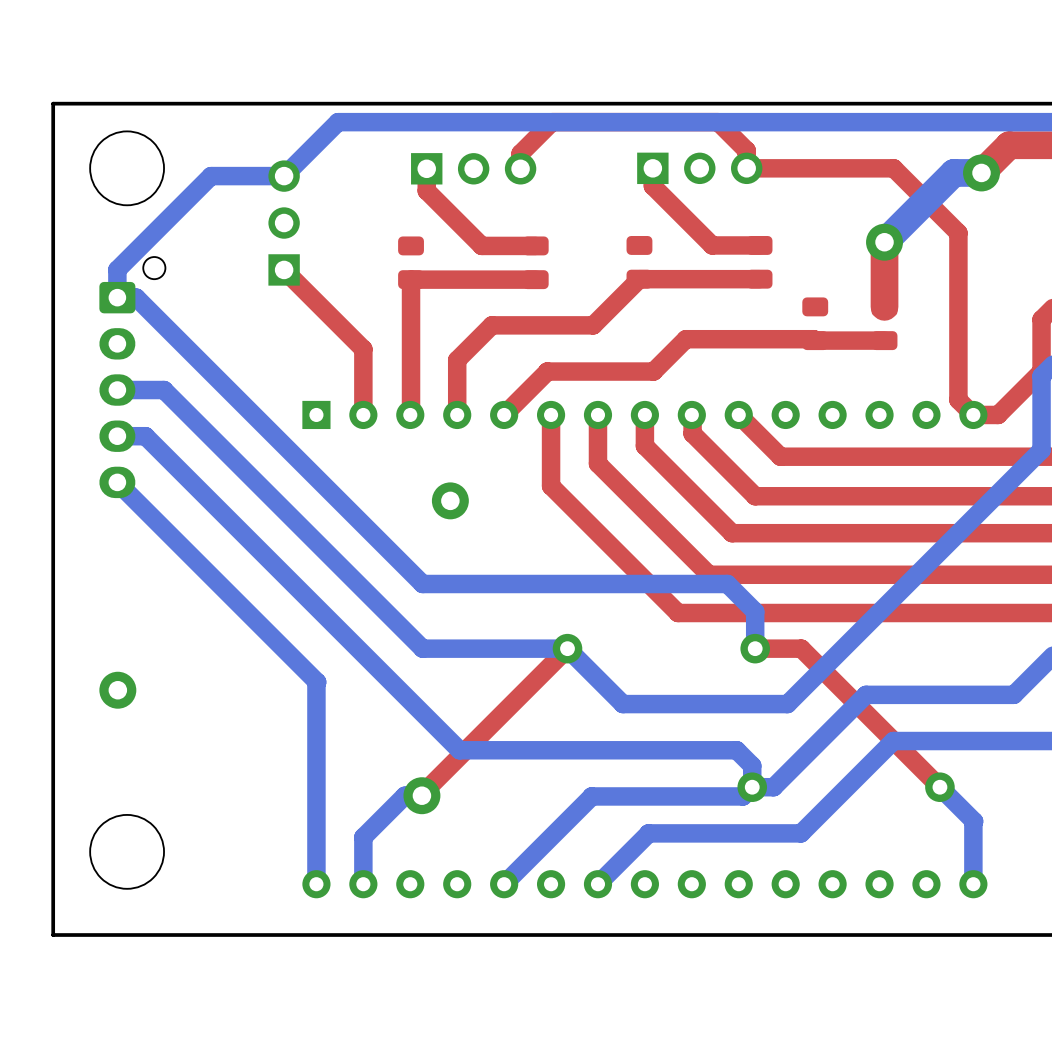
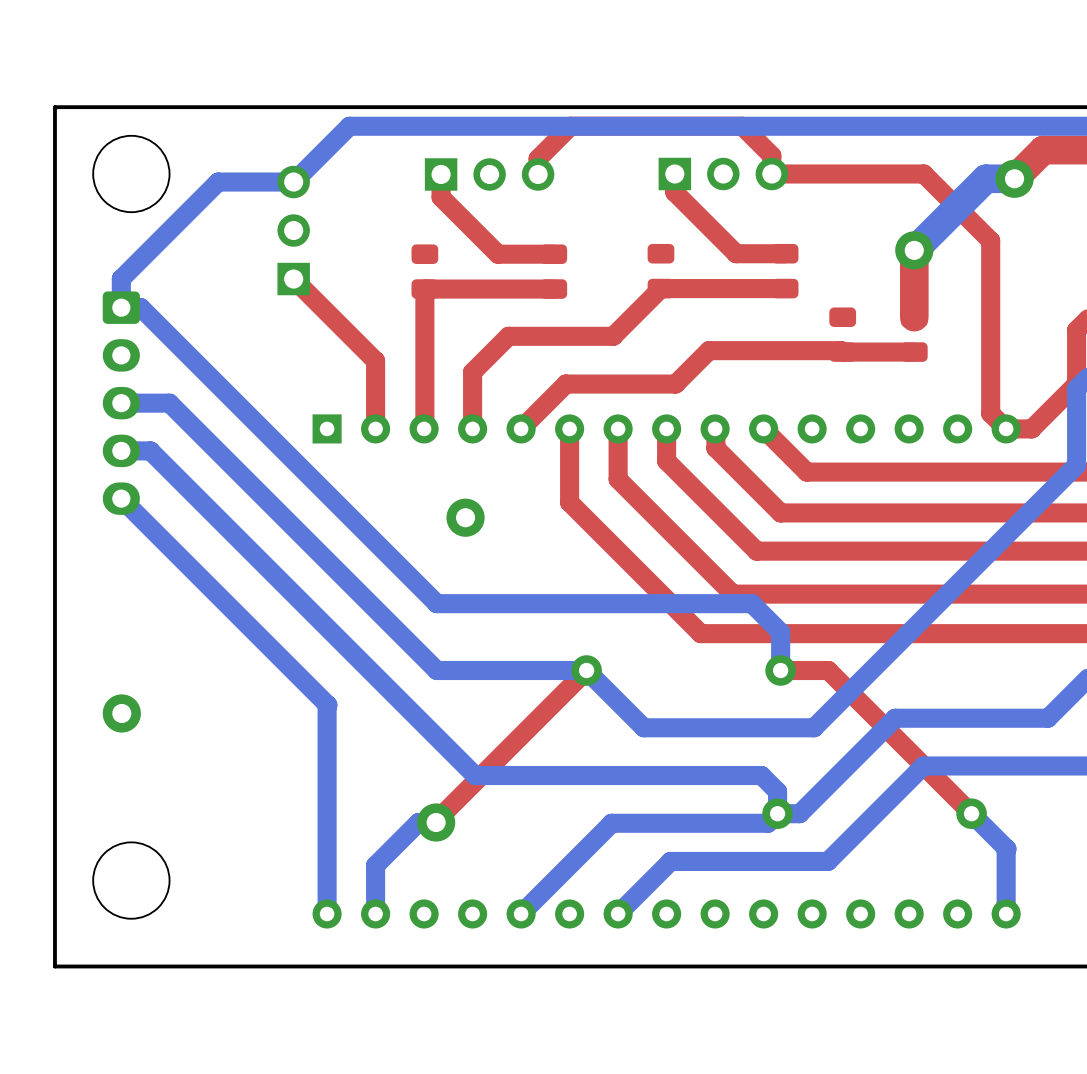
part: (132, 377) -> none

